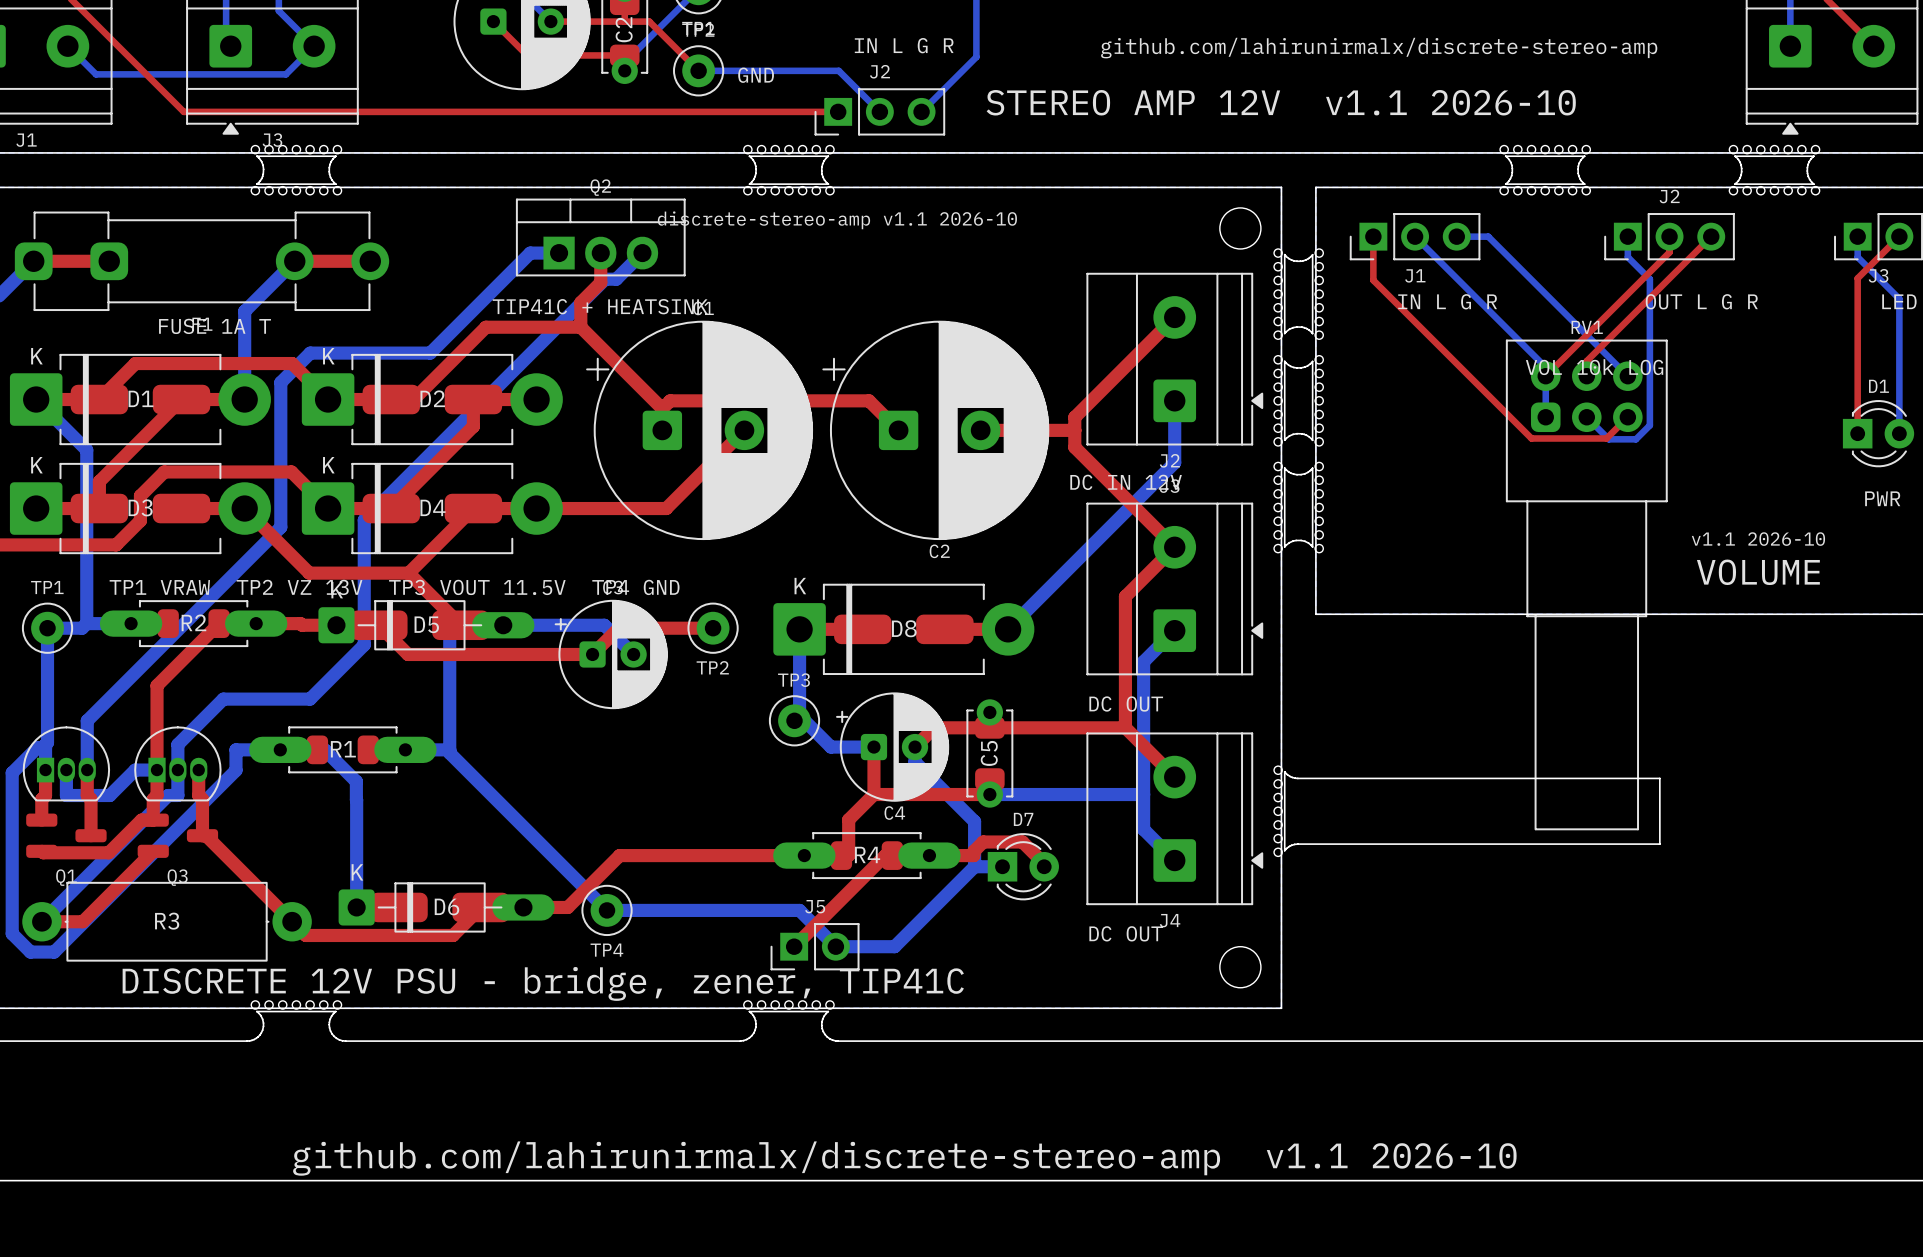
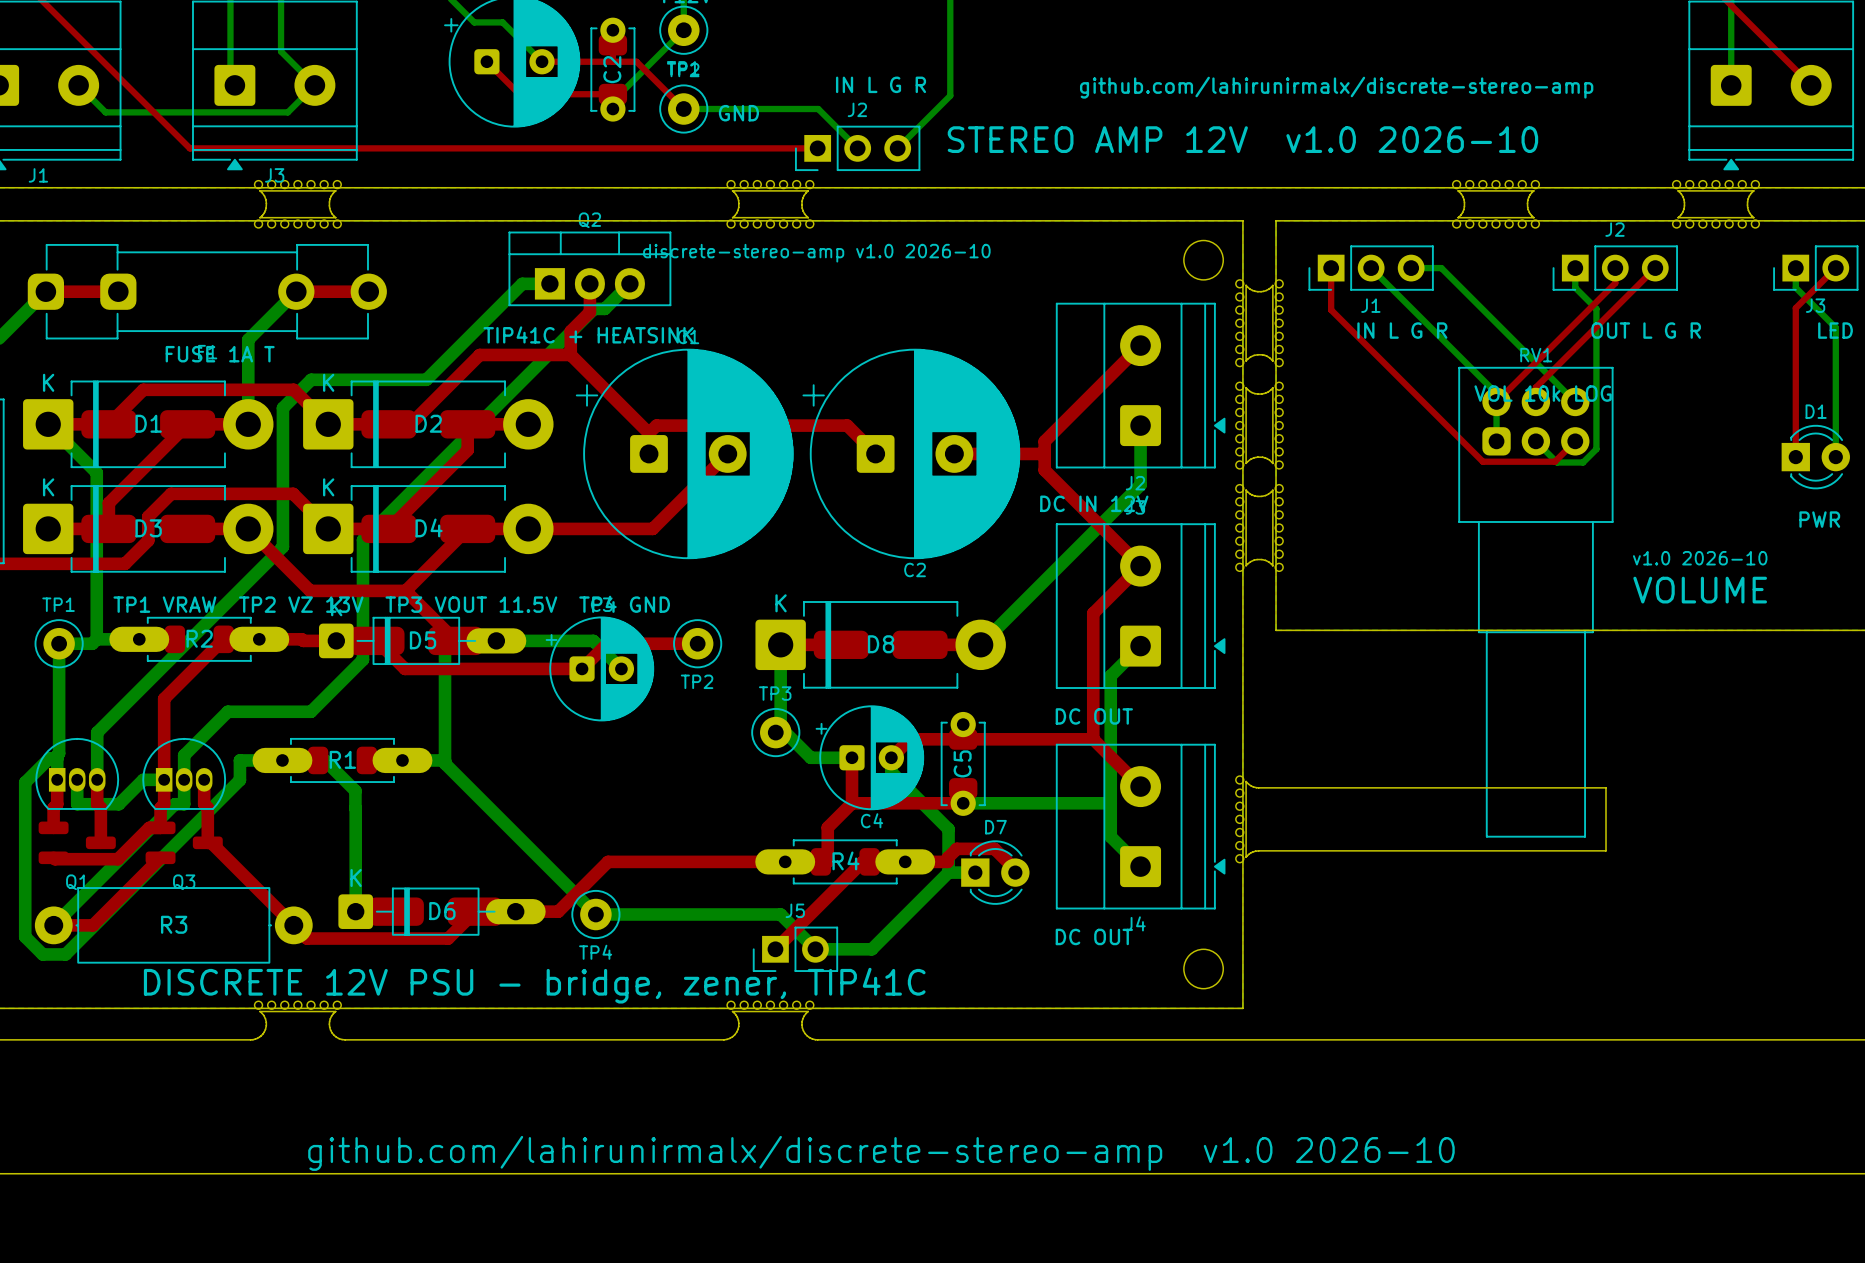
text: STEREO AMP 12V v1.1 2026-10 (1281, 102) -> STEREO AMP 12V v1.0 2026-10 (1242, 139)
text: discrete-stereo-amp v1.1 2026-10 (837, 220) -> discrete-stereo-amp v1.0 2026-10 (816, 253)
text: v1.1 2026-10 (1758, 539) -> v1.0 2026-10 (1700, 558)
text: github.com/lahirunirmalx/discrete-stereo-amp v1.1 2026-10 (904, 1158) -> github.com/lahirunirmalx/discrete-stereo-amp v1.0 2026-10 (881, 1153)

